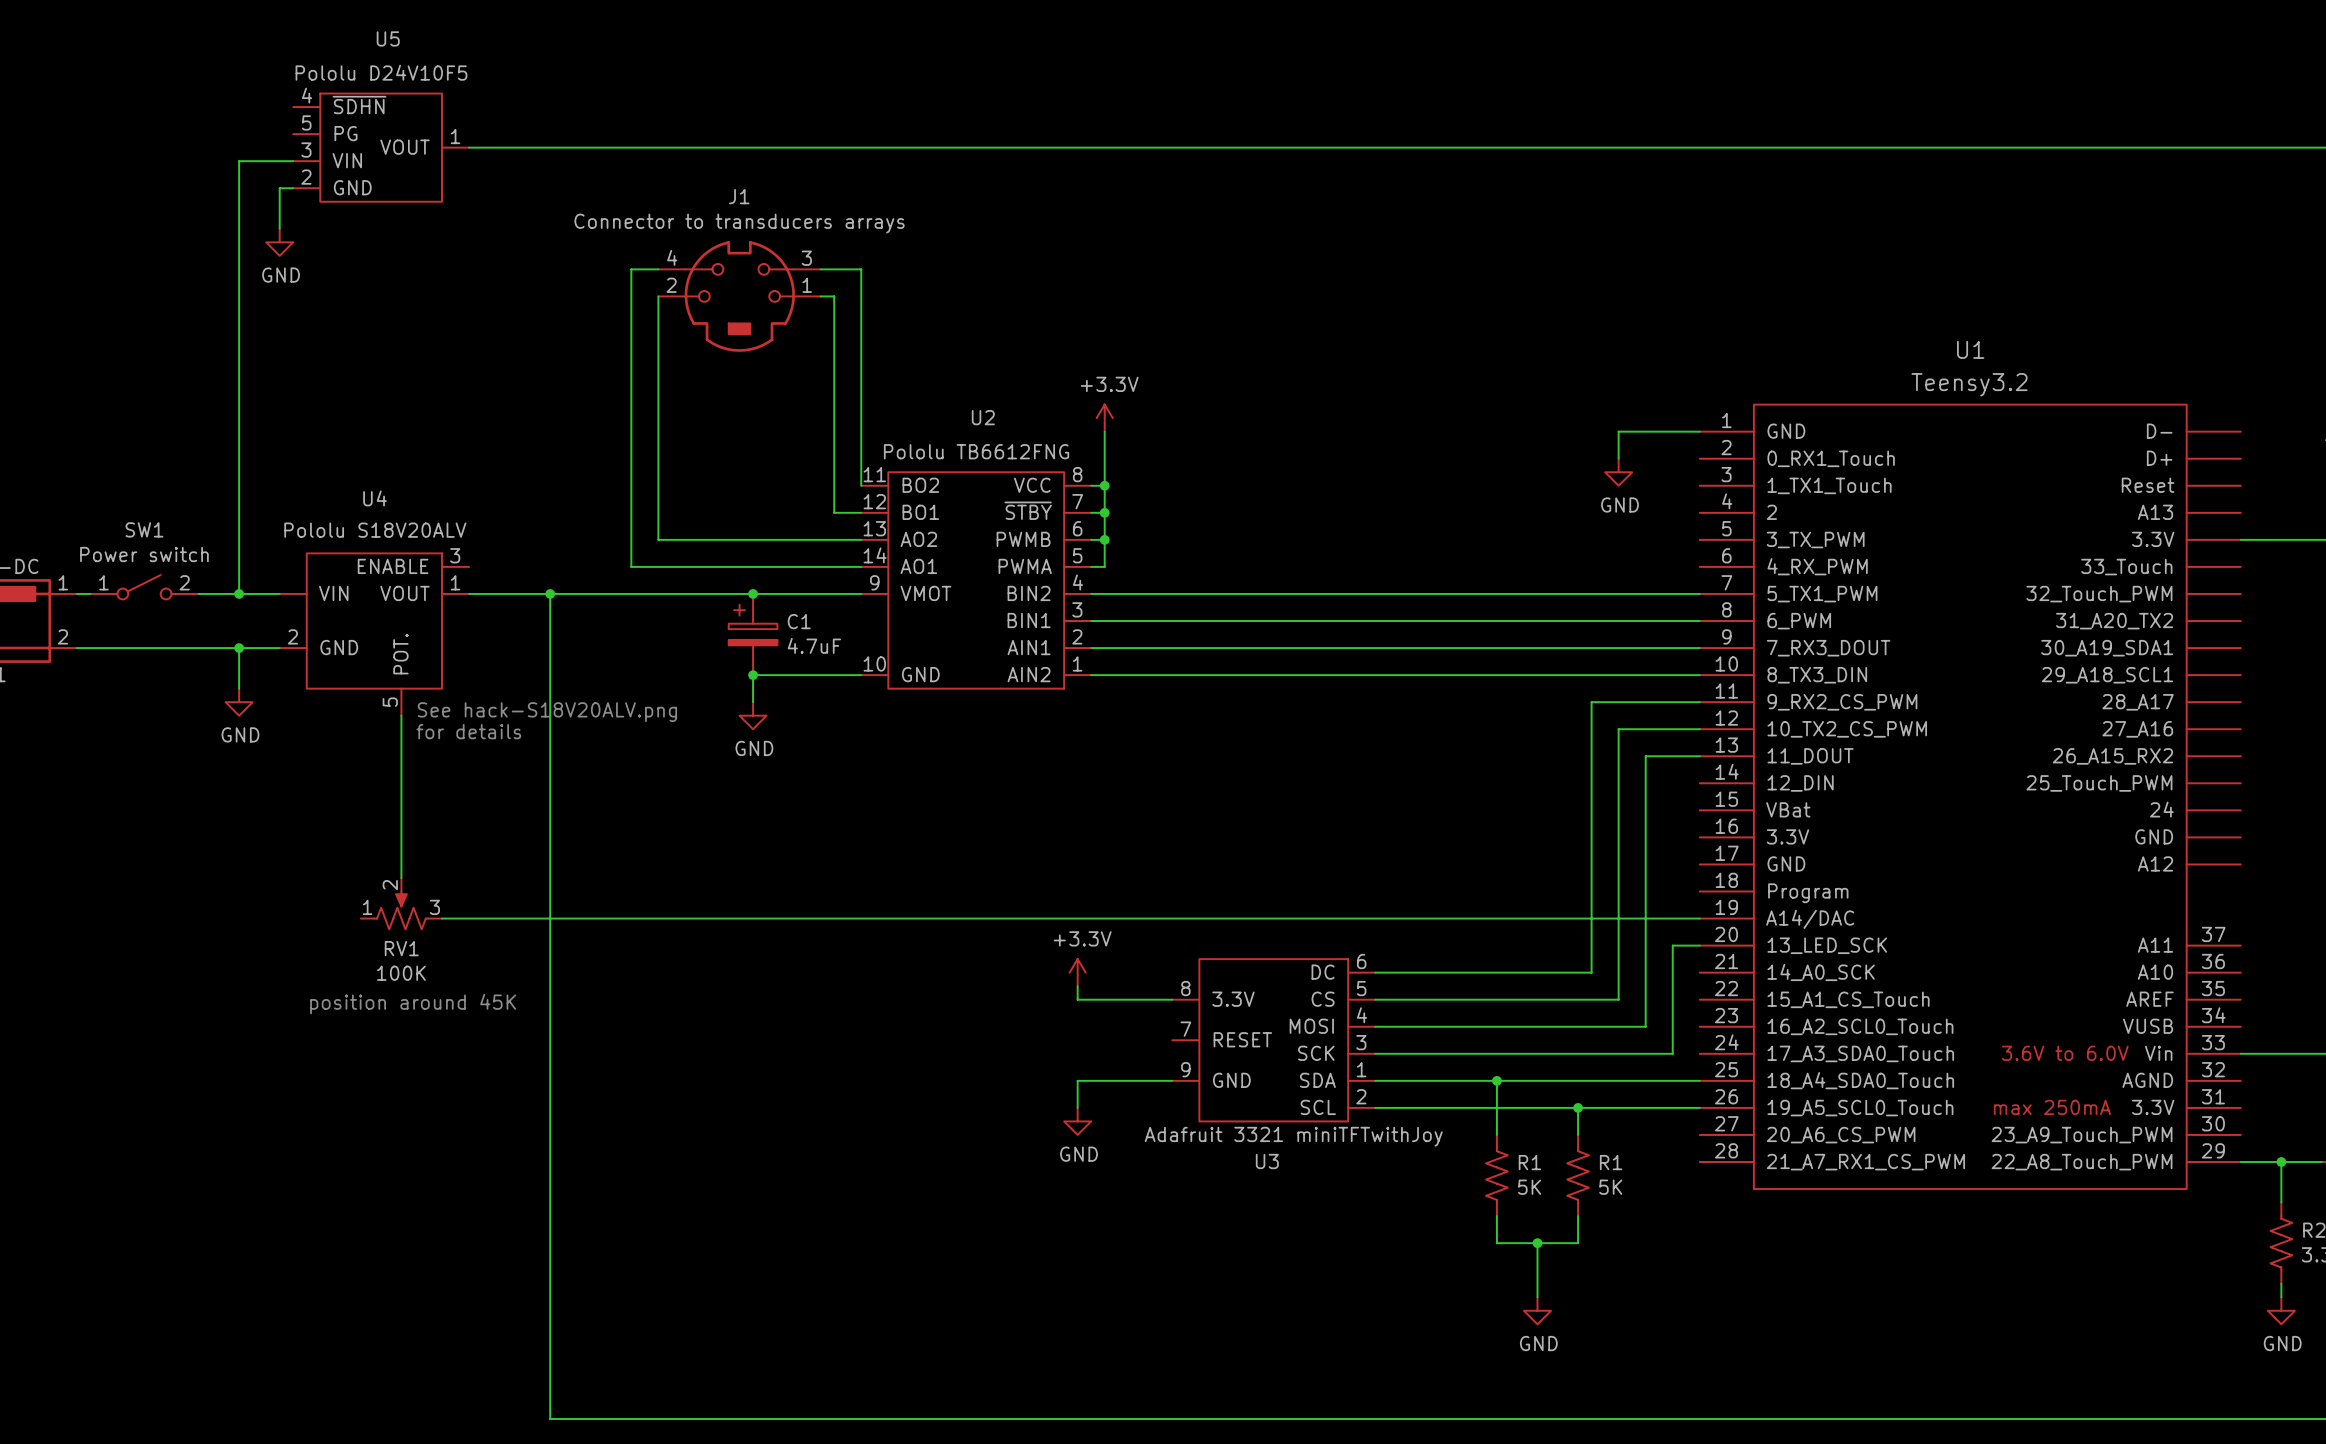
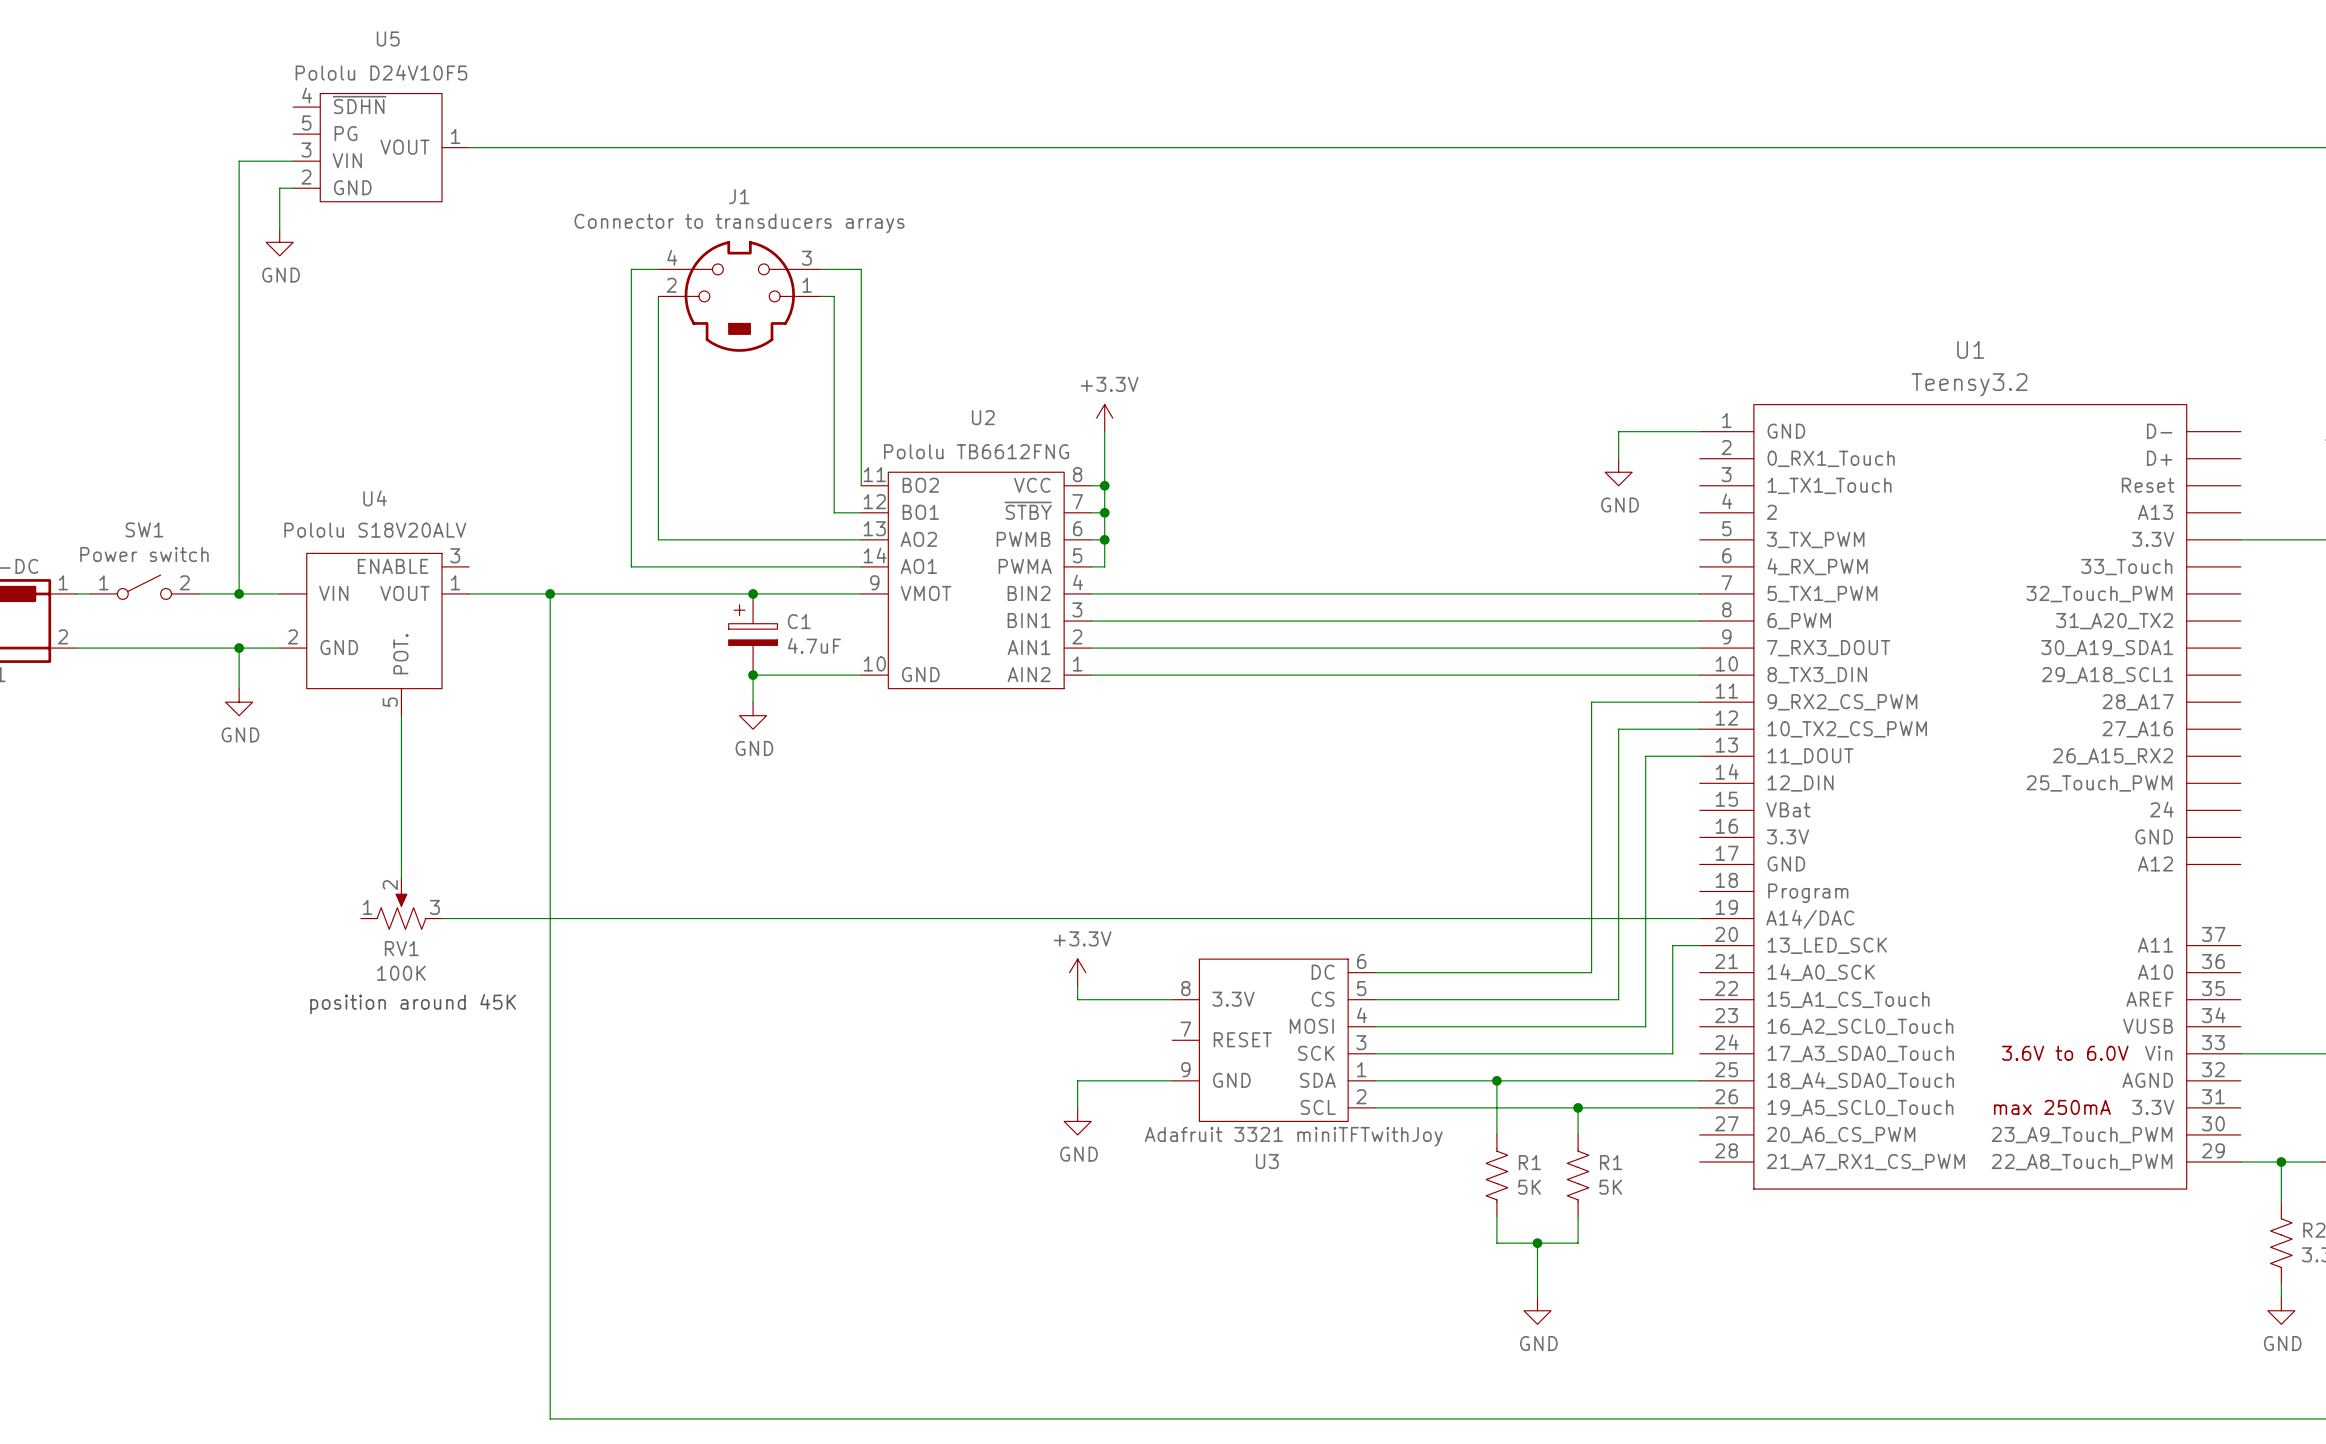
text: See hack-S18V20ALV.png (547, 712) -> none
text: for details (468, 731) -> none

